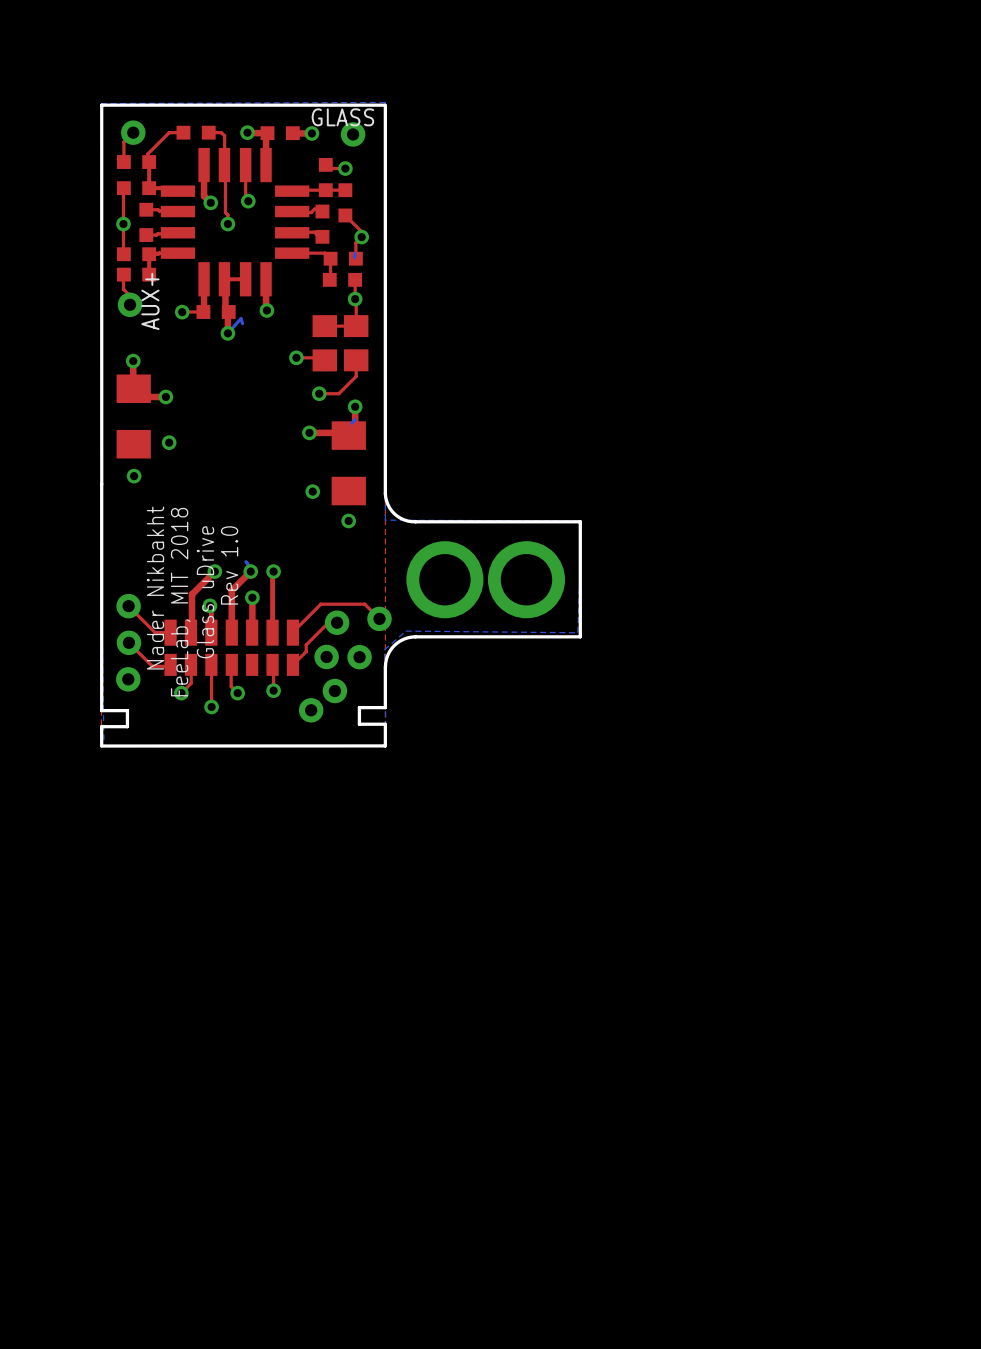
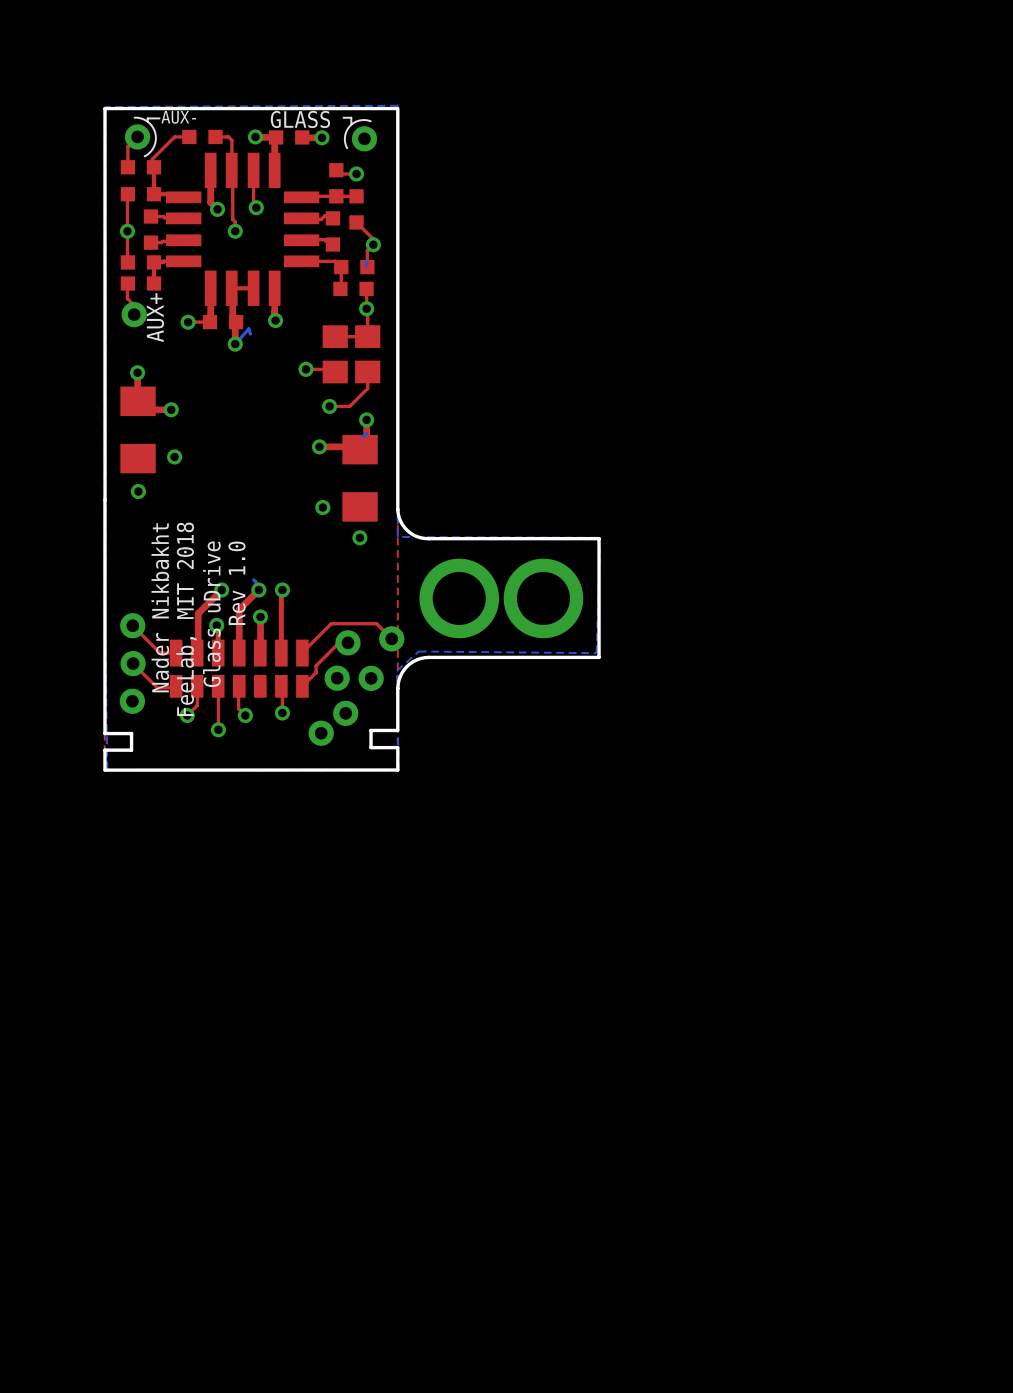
line: none -> (134, 117) (146, 120) (155, 132) (154, 145) (144, 156)
AUX- name: none -> AUX- (178, 117)
line: none -> (159, 118) (147, 118) (147, 121)
line: none -> (343, 117) (351, 117) (351, 124)
GLASS name position: GLASS (342, 117) -> GLASS (300, 119)
line: none -> (370, 121) (359, 120) (349, 126) (344, 137) (347, 148)

